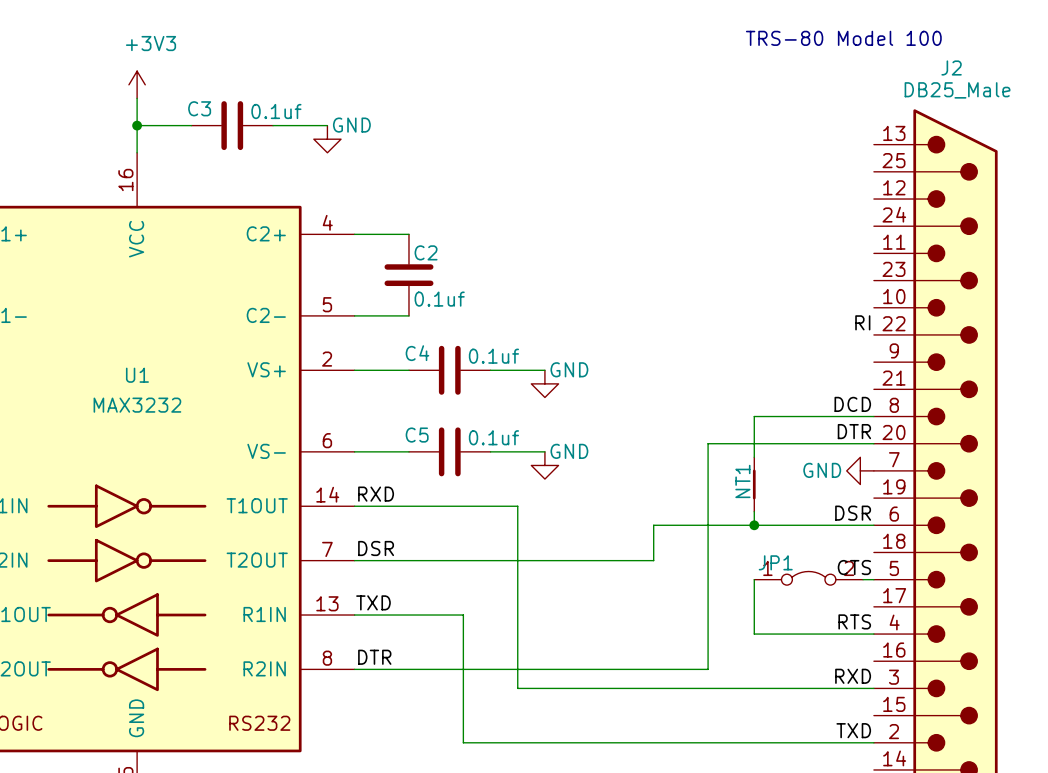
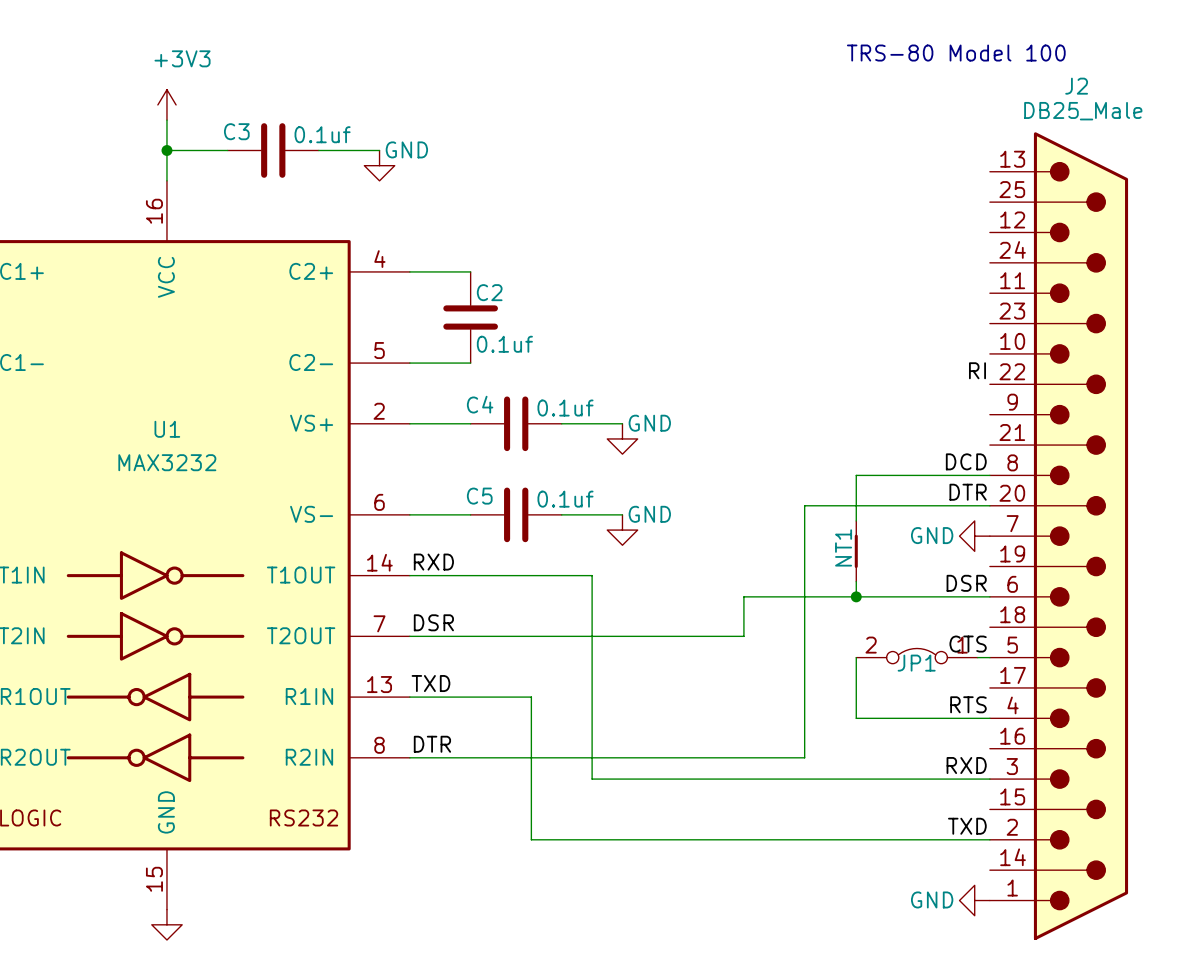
JP1 name position: JP1 (775, 562) -> JP1 (916, 663)
JP1 flip: as is (808, 578) -> left-right (917, 656)

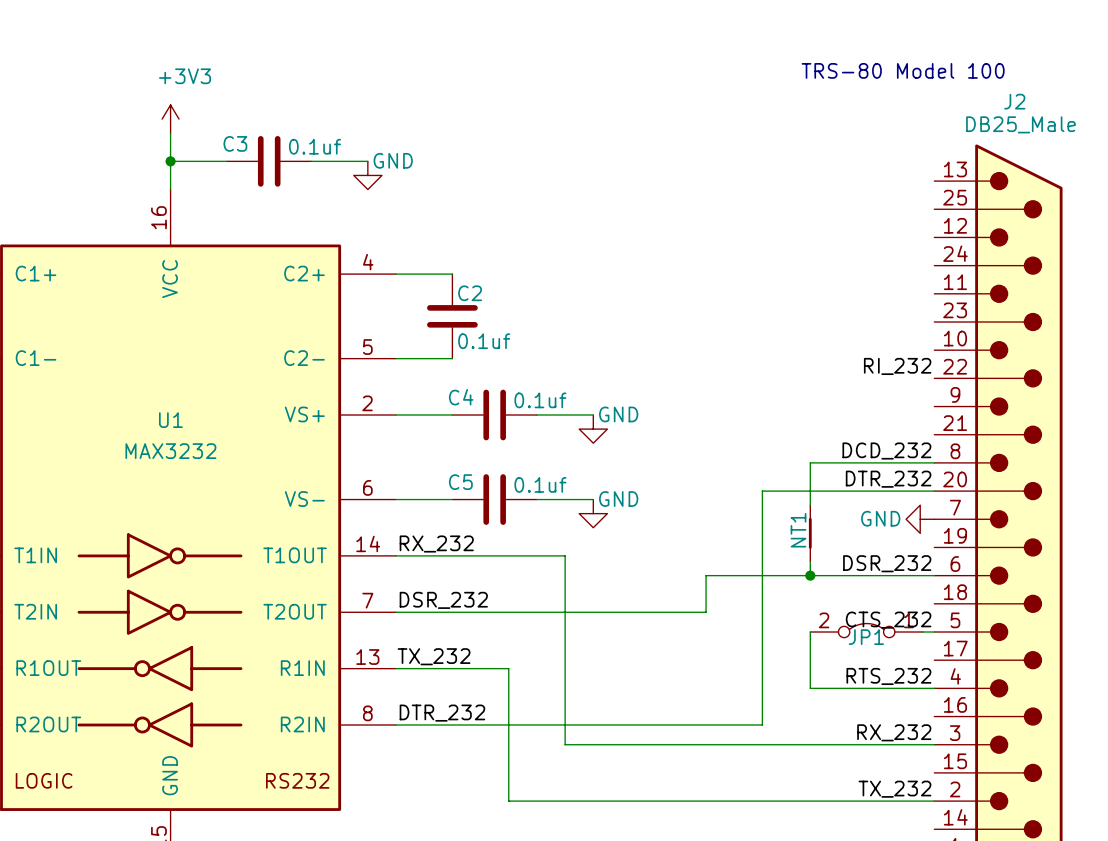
label: RI (977, 370) -> RI_232 (897, 366)
label: DCD (966, 461) -> DCD_232 (886, 451)
label: DTR (968, 492) -> DTR_232 (888, 479)
label: RXD (433, 562) -> RX_232 (436, 544)
label: DSR (966, 583) -> DSR_232 (887, 563)
label: DSR (433, 622) -> DSR_232 (443, 600)
label: CTS (968, 644) -> CTS_232 (888, 620)
label: TXD (430, 683) -> TX_232 (434, 656)
label: RTS (968, 704) -> RTS_232 (888, 676)
label: DTR (432, 744) -> DTR_232 (442, 713)
label: RXD (966, 765) -> RX_232 (894, 732)
label: TXD (967, 826) -> TX_232 (894, 789)

